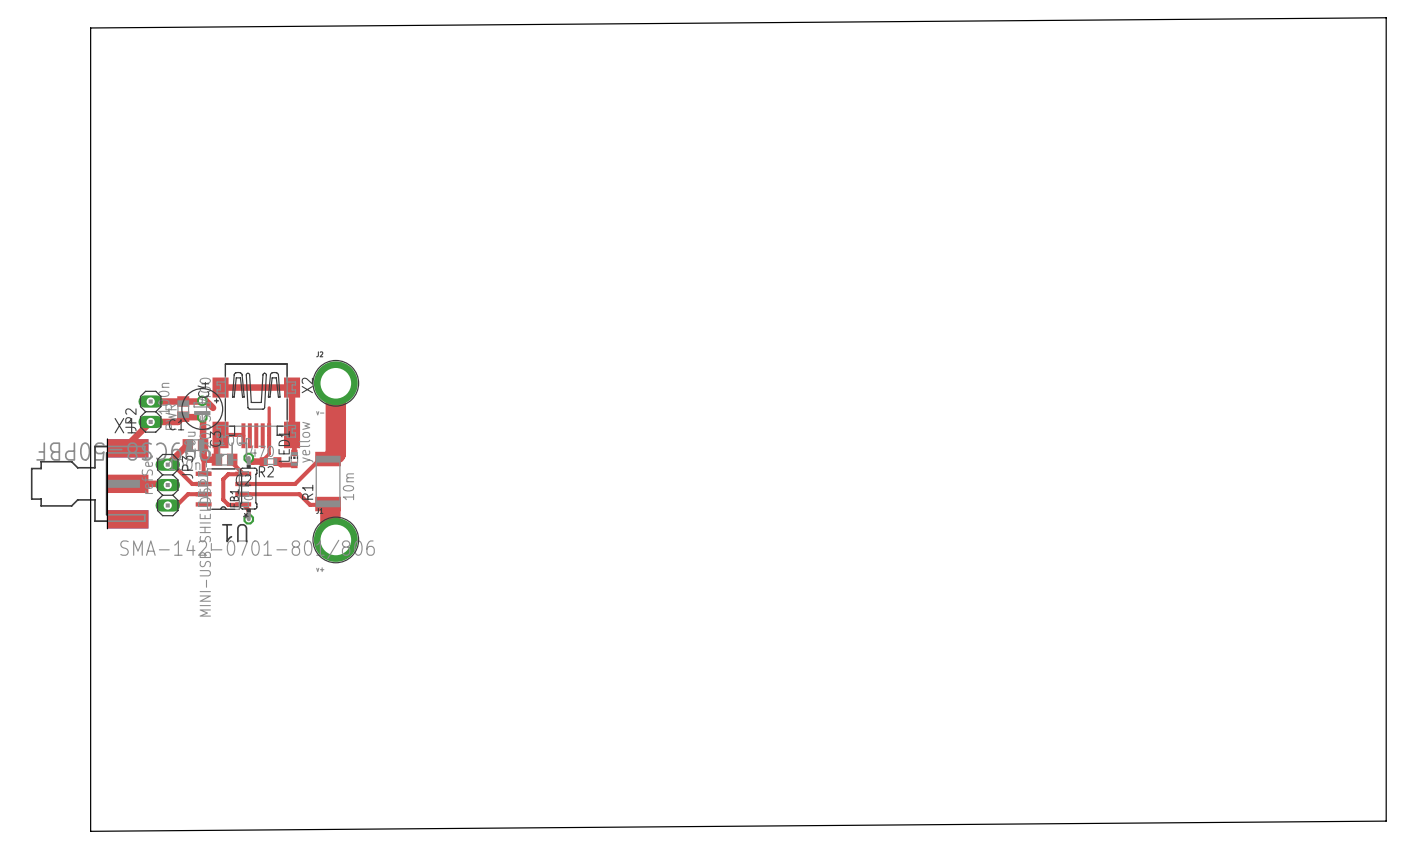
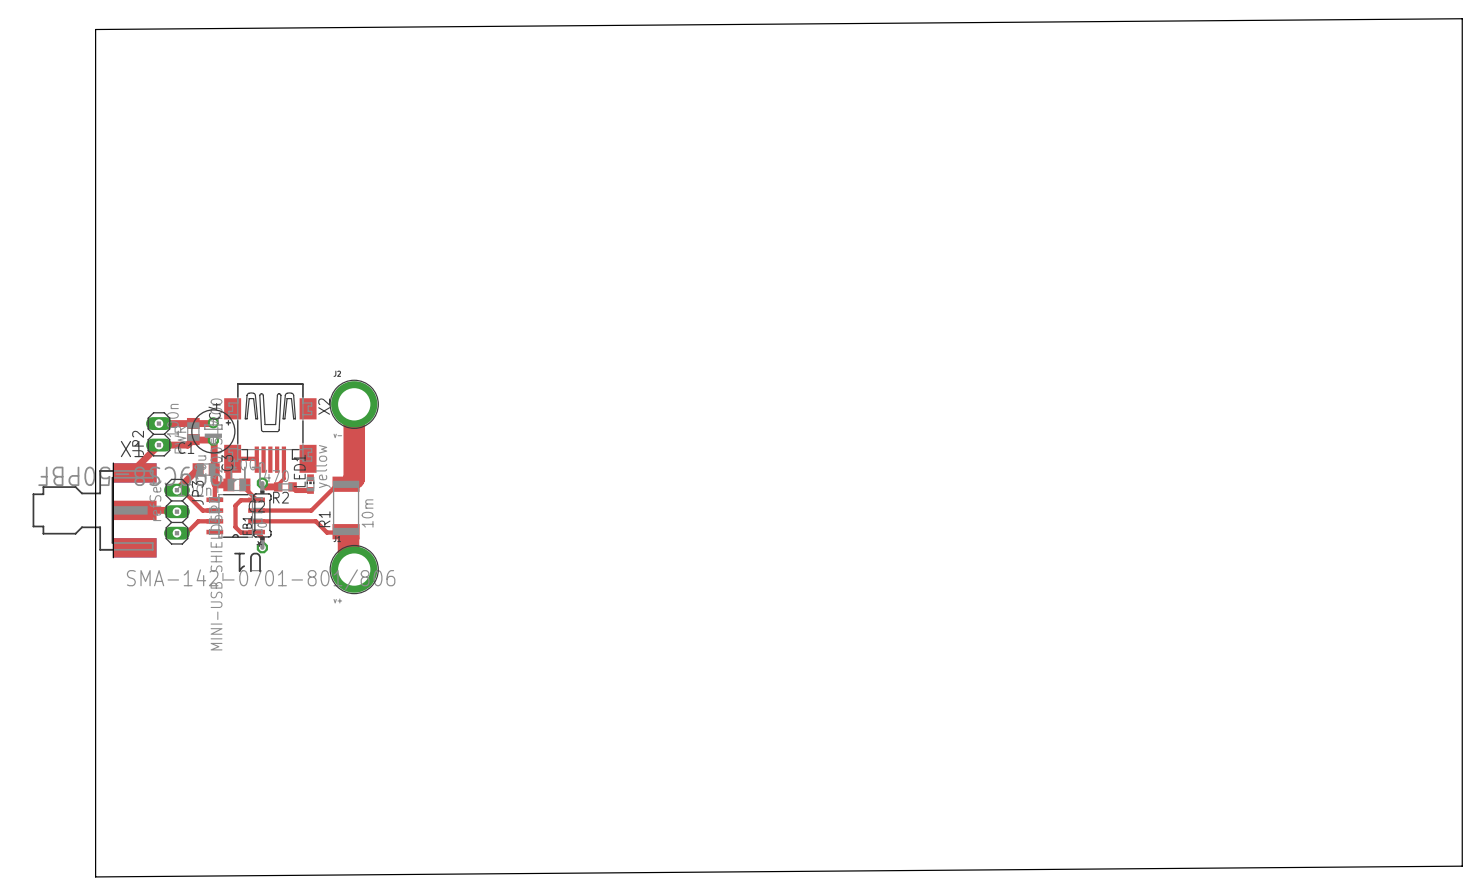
top track: (220, 387) (292, 387) (292, 434) (294, 437) (294, 452) -> none
top track: (202, 400) (205, 400) (213, 407) -> none
top track: (269, 407) (269, 435) -> none

